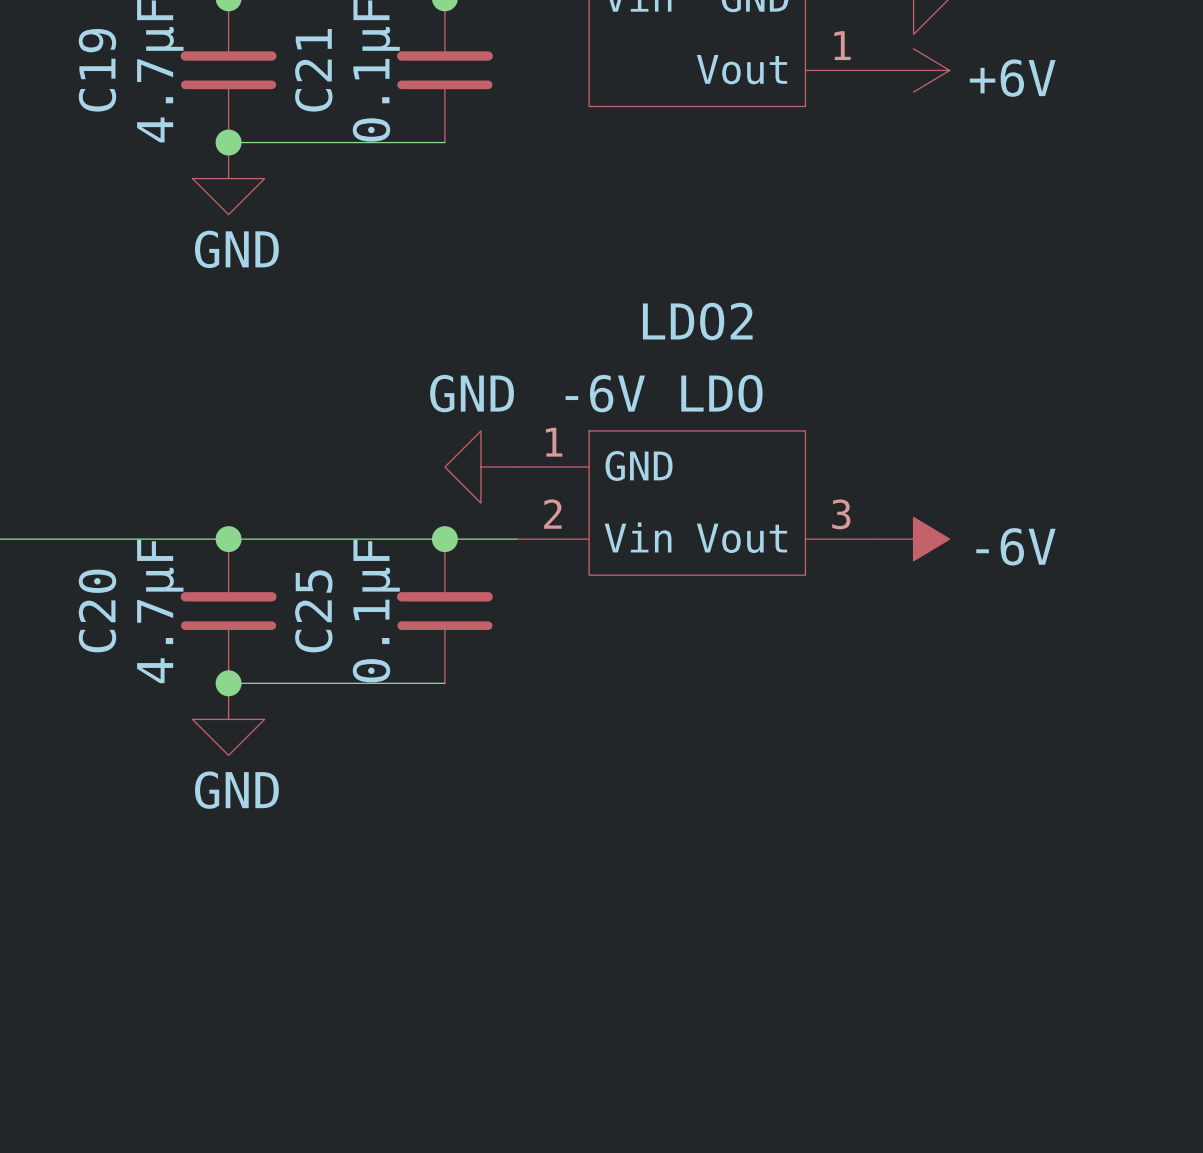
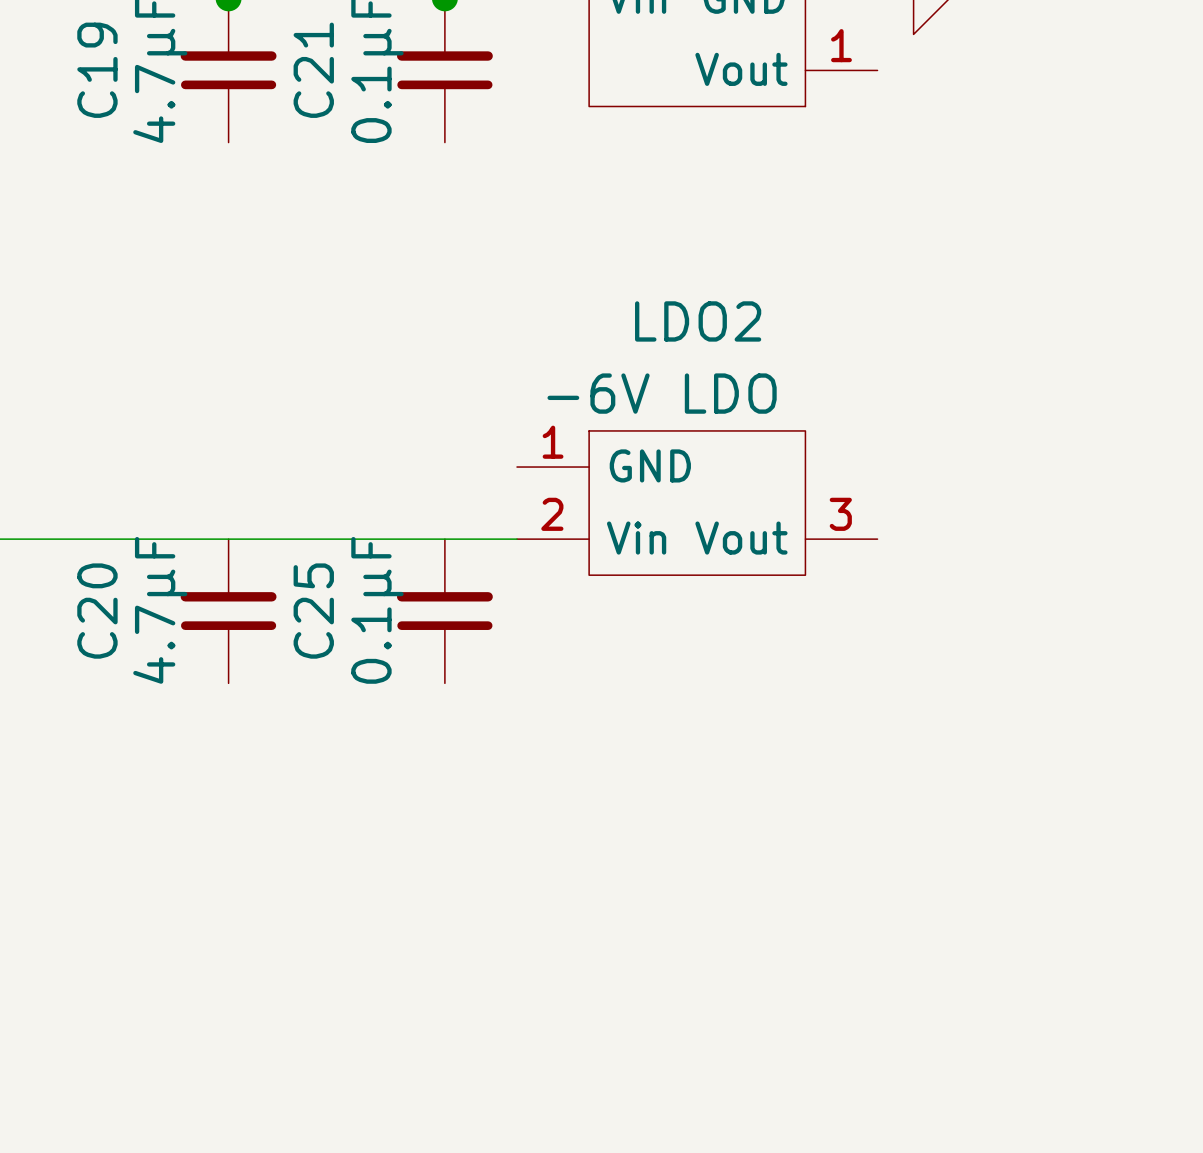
power symbol: +6V (913, 70) -> none
wire: (228, 142) (444, 142) -> none
junction: (228, 142) -> none
power symbol: GND (228, 178) -> none
power symbol: GND (480, 467) -> none
junction: (228, 539) -> none
junction: (444, 539) -> none
power symbol: -6V (913, 539) -> none
wire: (228, 683) (444, 683) -> none
junction: (228, 683) -> none
power symbol: GND (228, 719) -> none

